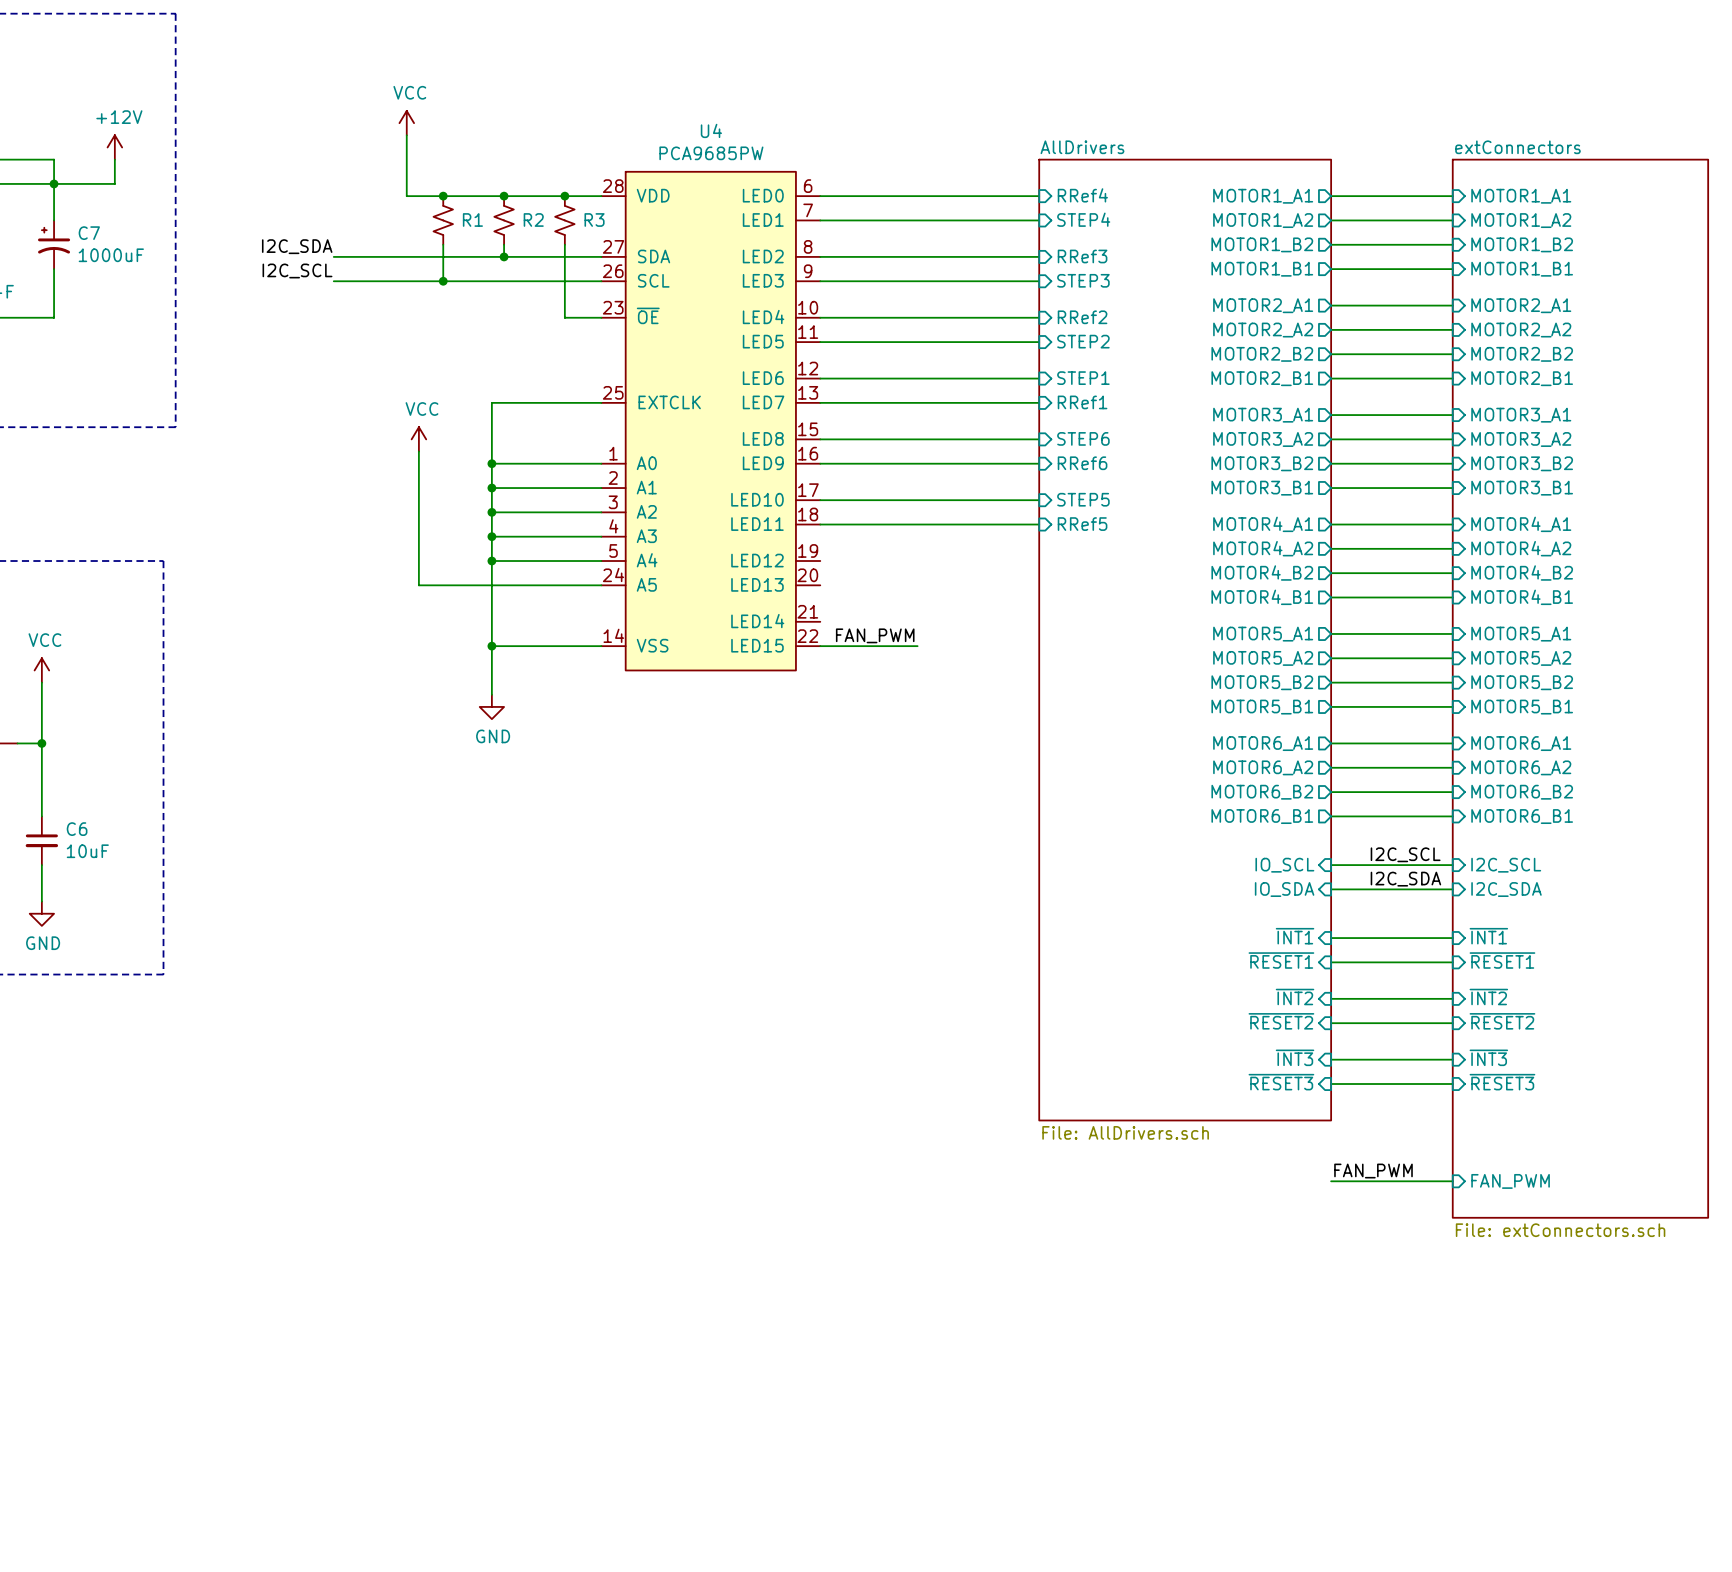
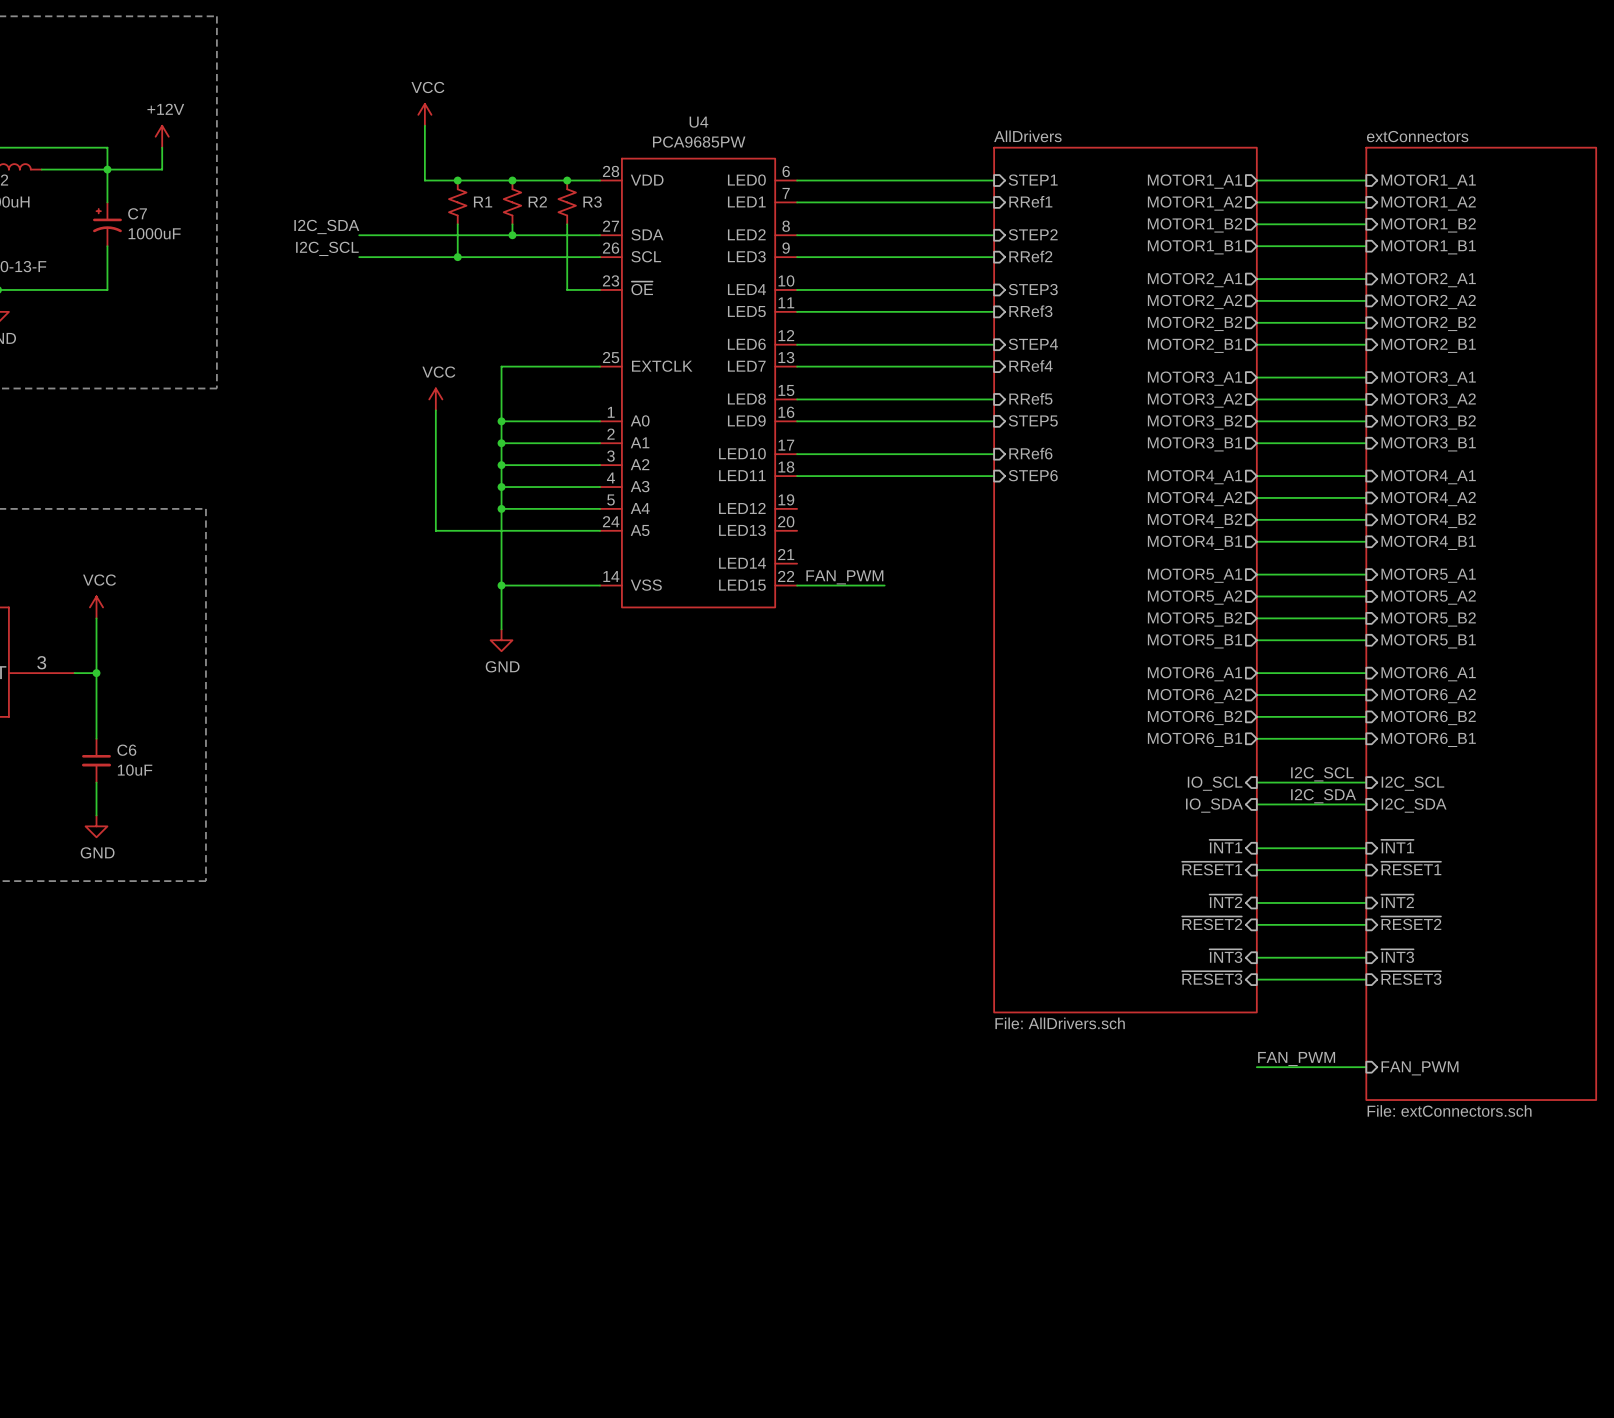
sheet pin: RRef4 (1082, 195) -> STEP1 (1033, 180)
sheet pin: STEP4 (1083, 219) -> RRef1 (1030, 201)
sheet pin: RRef3 (1082, 256) -> STEP2 (1033, 234)
sheet pin: STEP3 (1083, 280) -> RRef2 (1030, 256)
sheet pin: RRef2 (1082, 317) -> STEP3 (1033, 289)
sheet pin: STEP2 (1083, 341) -> RRef3 (1030, 311)
sheet pin: STEP1 (1083, 378) -> STEP4 (1033, 344)
sheet pin: RRef1 (1082, 402) -> RRef4 (1030, 365)
sheet pin: STEP6 (1083, 438) -> RRef5 (1030, 398)
sheet pin: RRef6 (1082, 463) -> STEP5 (1033, 420)
sheet pin: STEP5 (1083, 499) -> RRef6 (1030, 453)
sheet pin: RRef5 (1082, 524) -> STEP6 (1033, 475)

